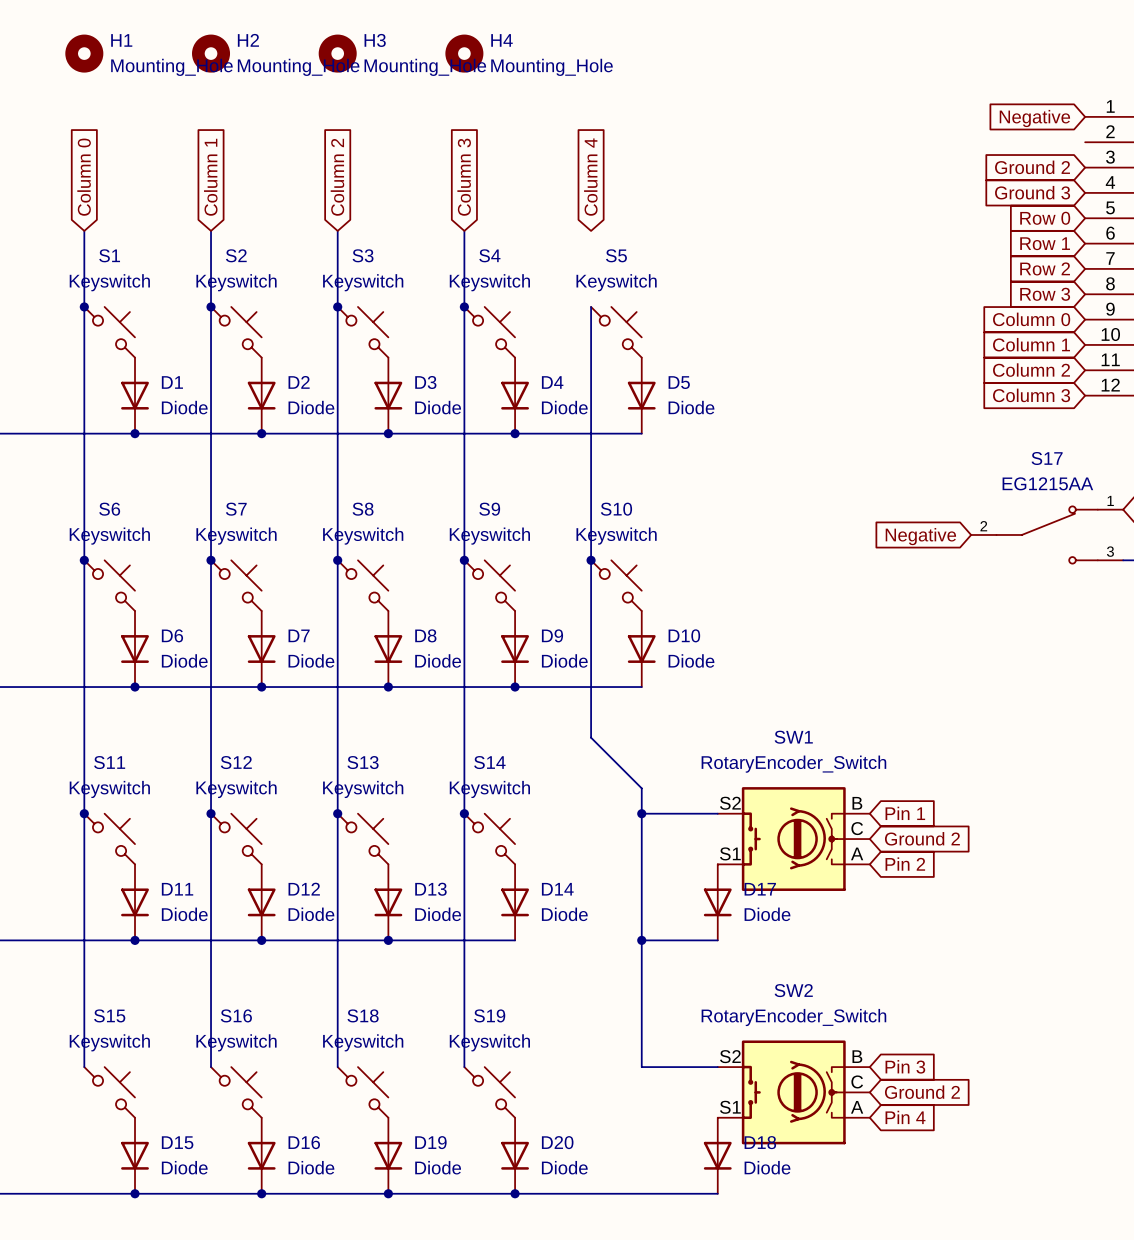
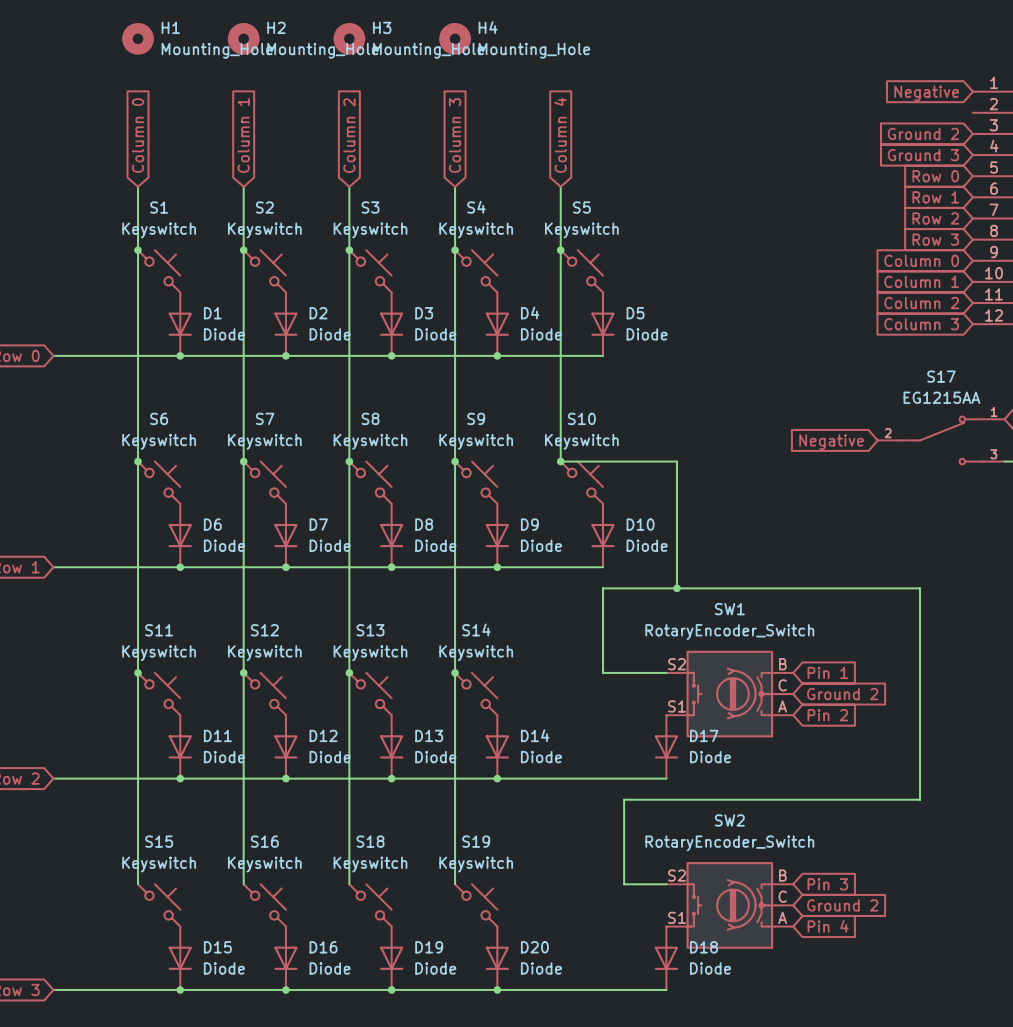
wire: none -> (560, 186) (560, 250)
junction: none -> (560, 250)
wire: (591, 560) (591, 737) (641, 788) -> (560, 461) (676, 461) (676, 588)
junction: none -> (676, 588)
wire: (641, 813) (641, 1067) (667, 1067) -> (603, 651) (603, 588) (920, 588) (920, 799) (624, 799) (624, 884)
junction: (641, 813) -> none
wire: none -> (497, 778) (603, 778)
junction: none -> (497, 778)
junction: (641, 940) -> none

